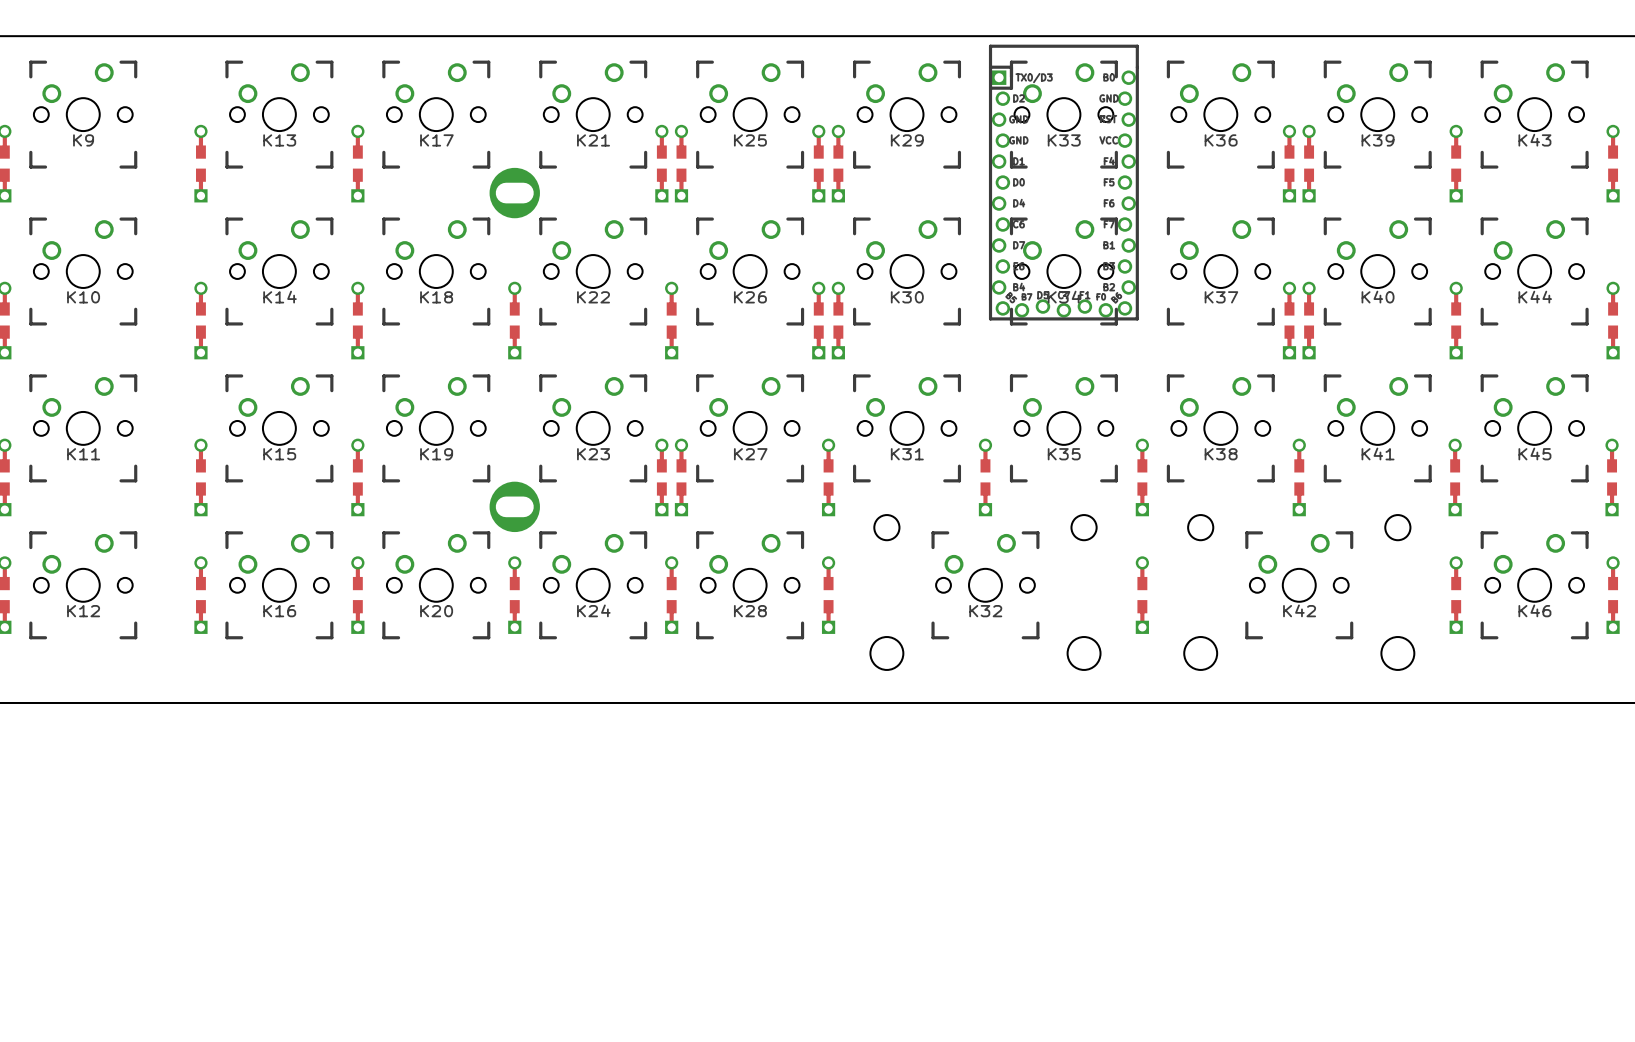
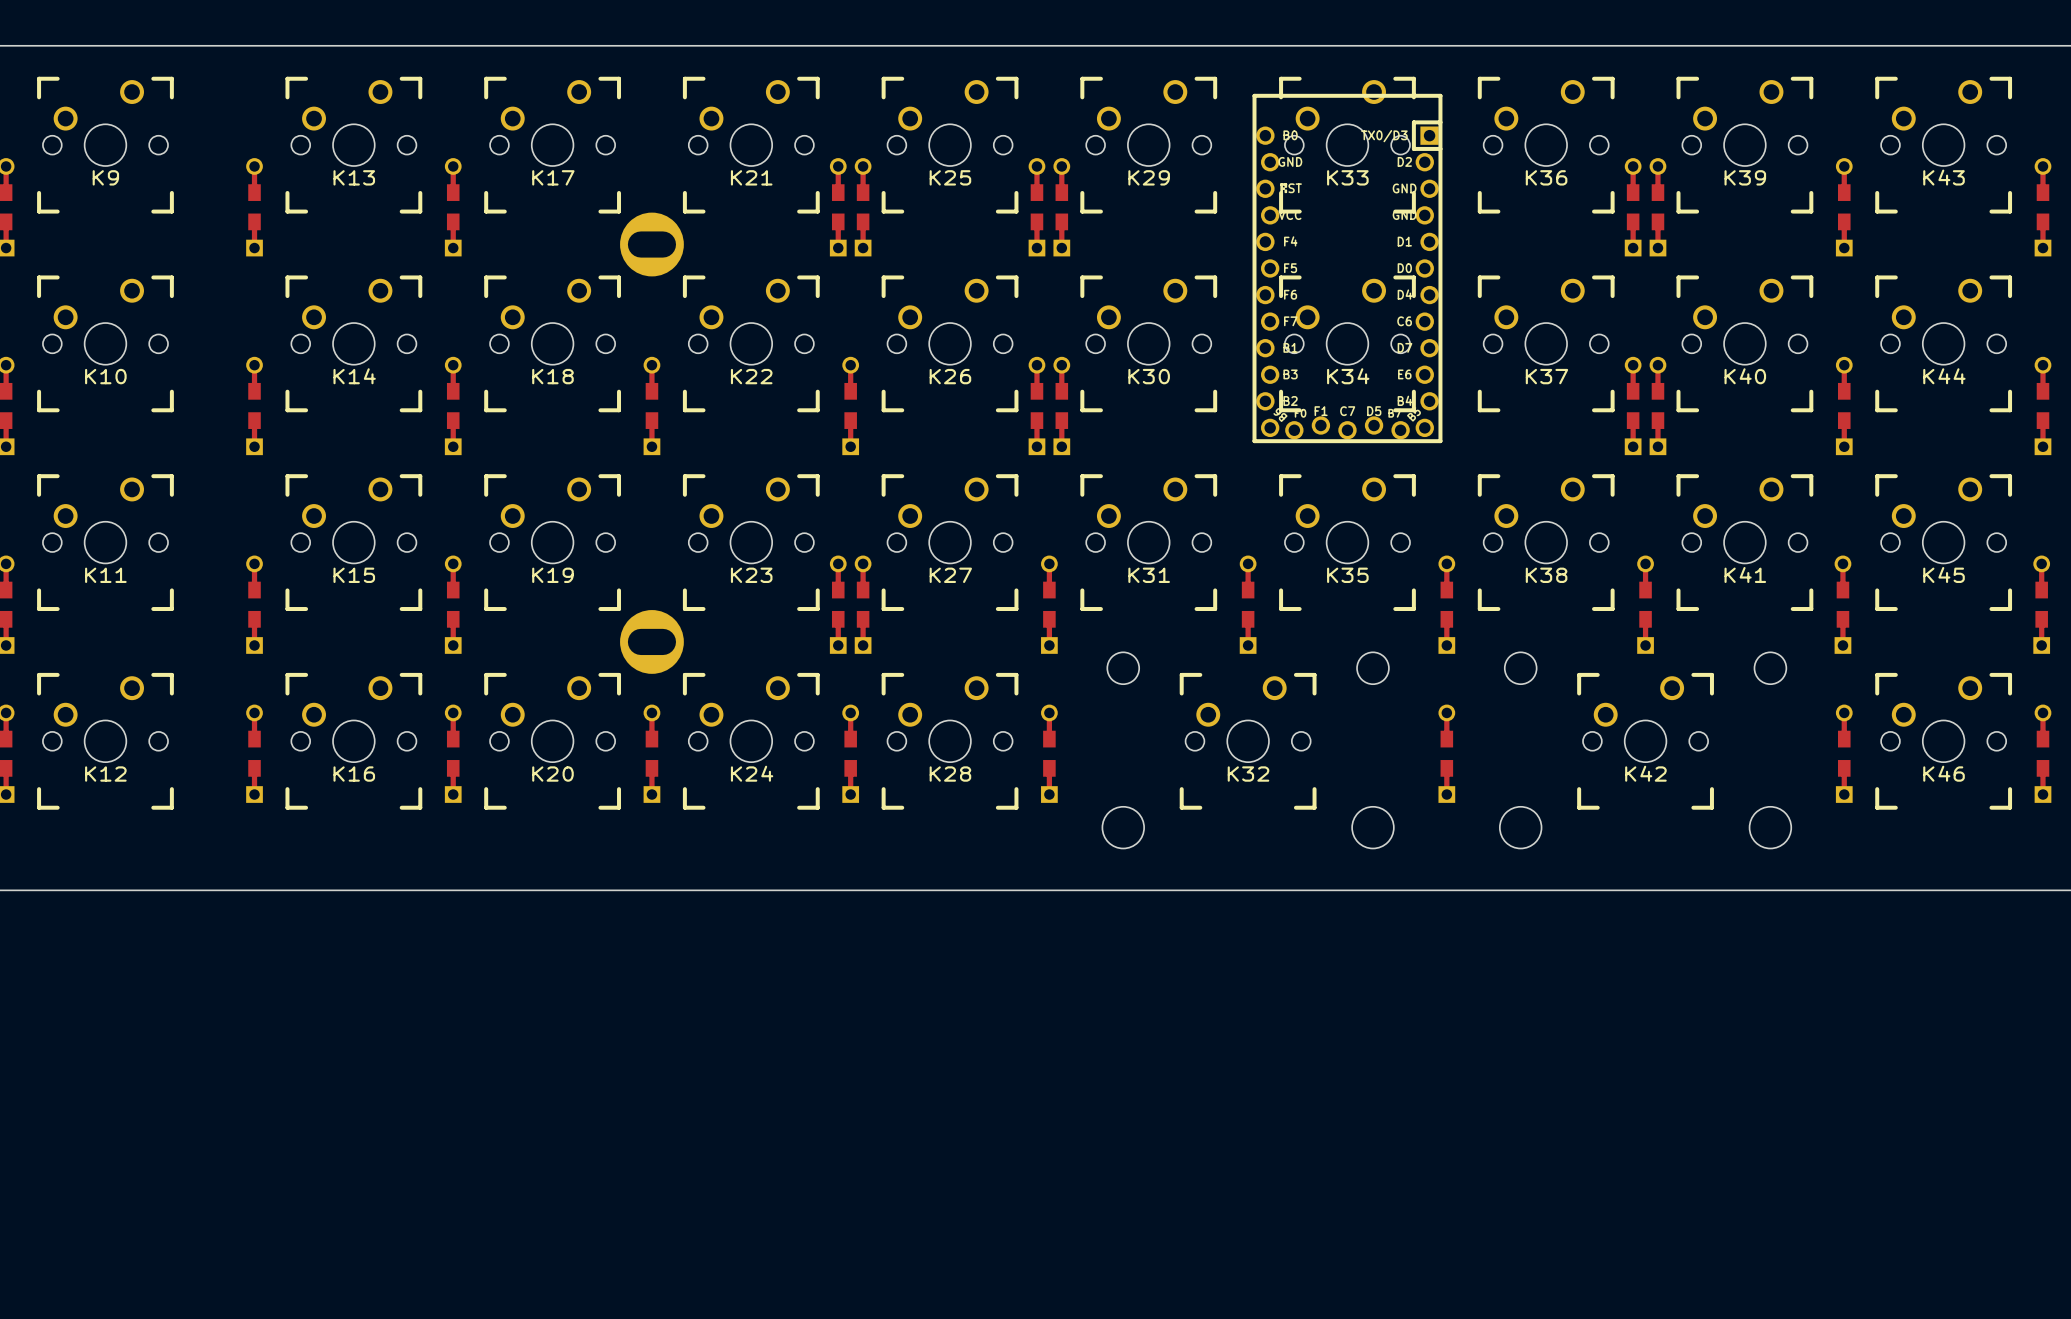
part side: top (1063, 182) -> bottom (1347, 268)

